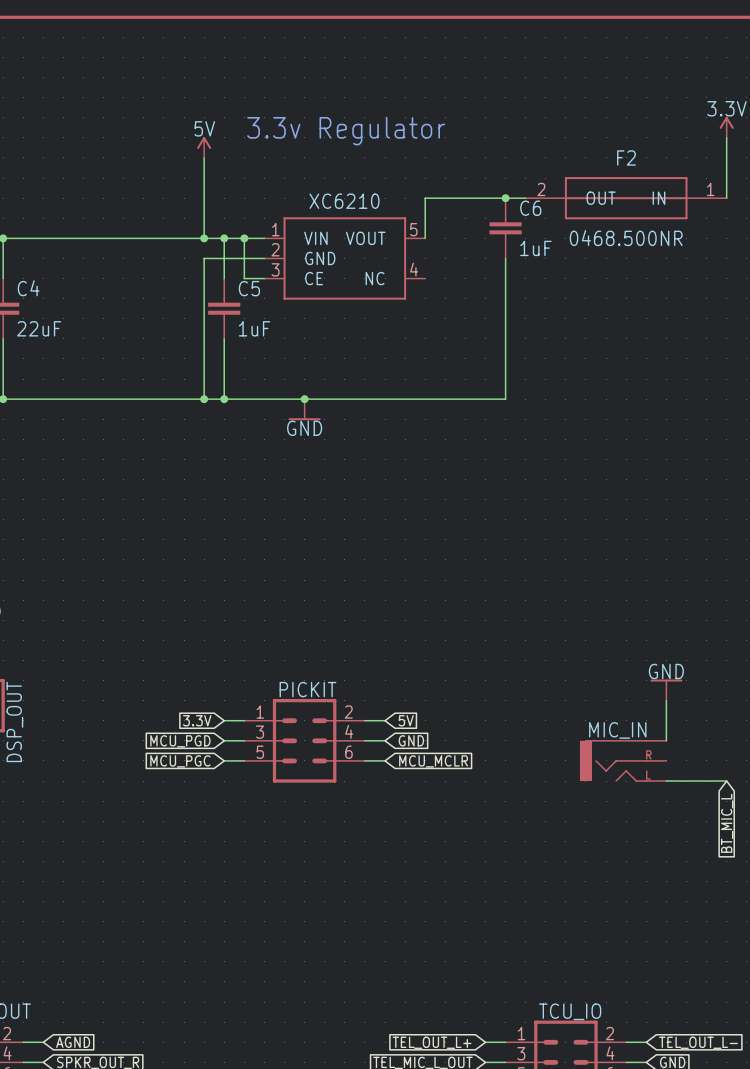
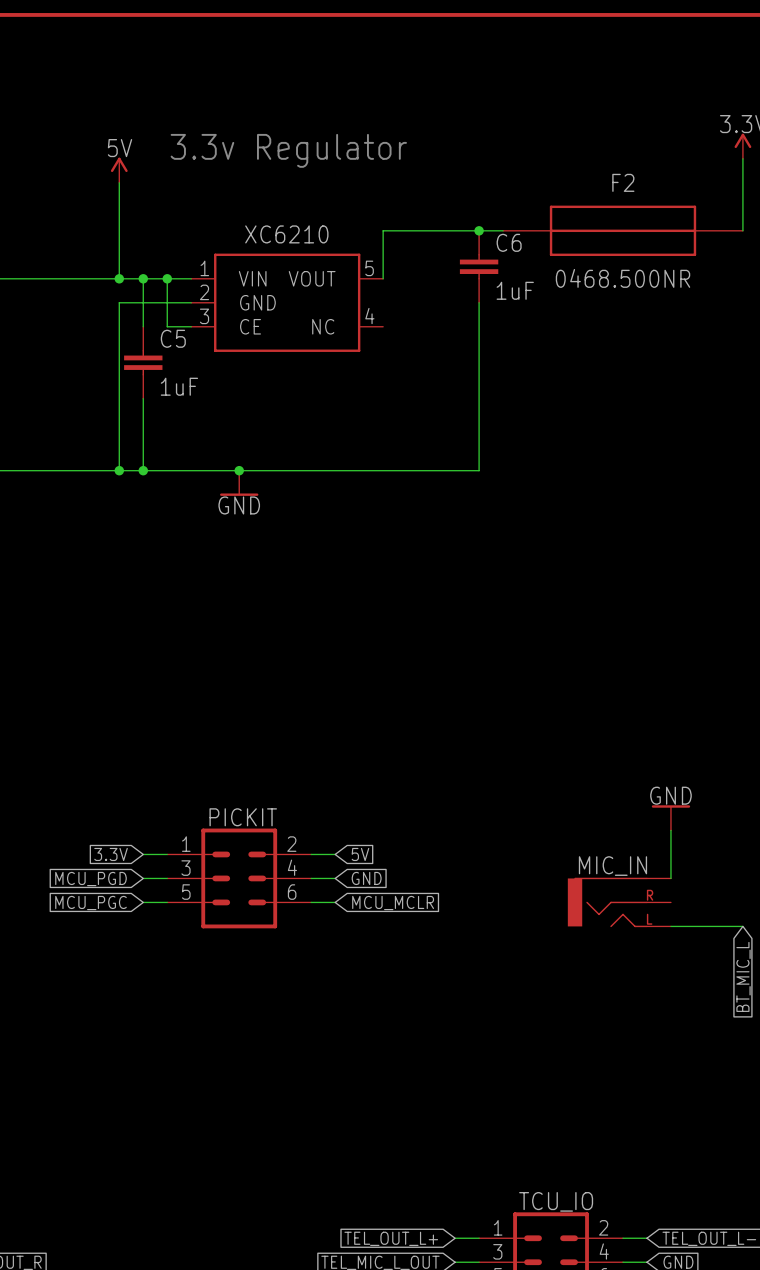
F2 pin number: 2 (541, 189) -> none
F2 pin number: 1 (710, 189) -> none
F2 pin name: OUT (601, 198) -> none
F2 pin name: IN (658, 198) -> none

